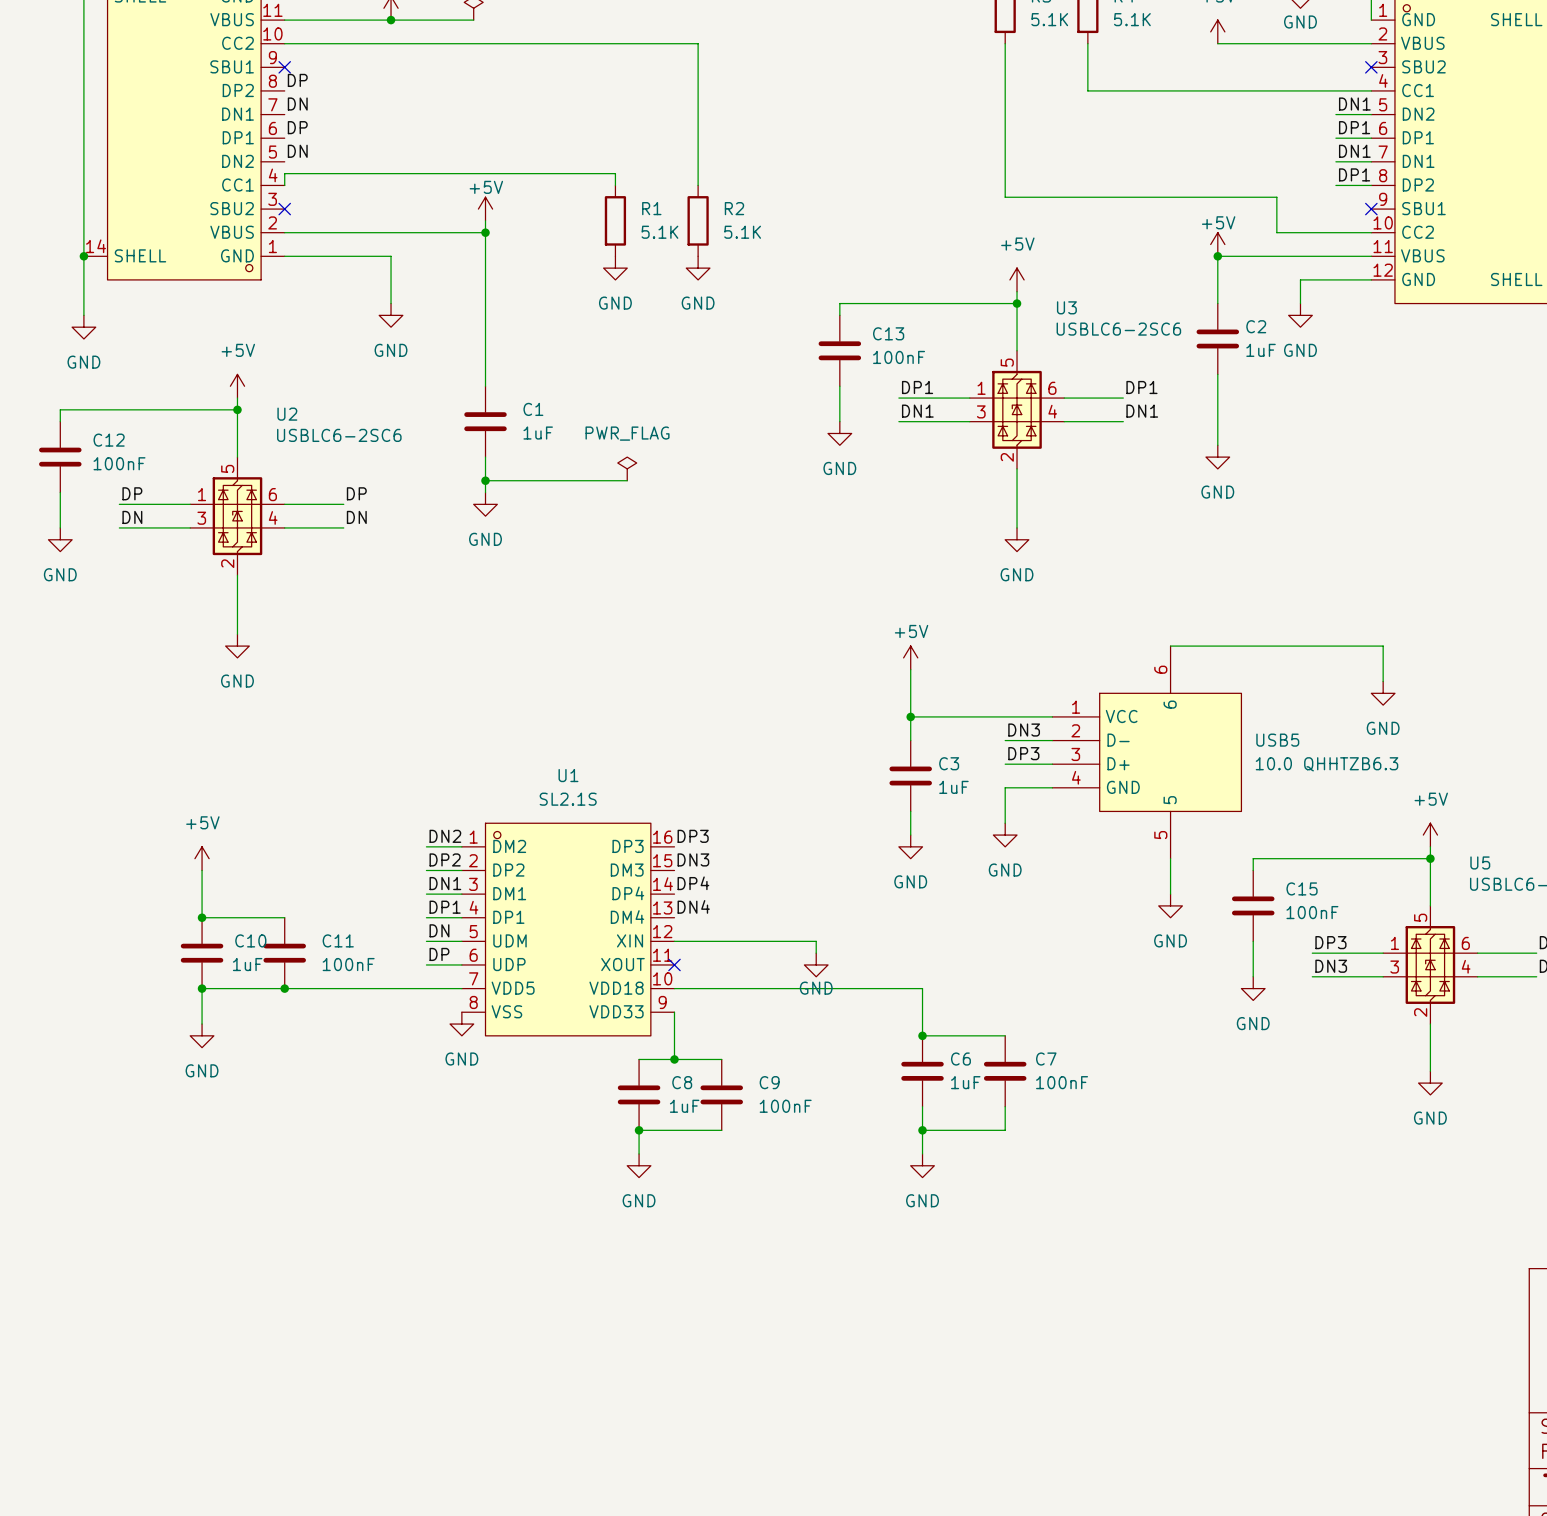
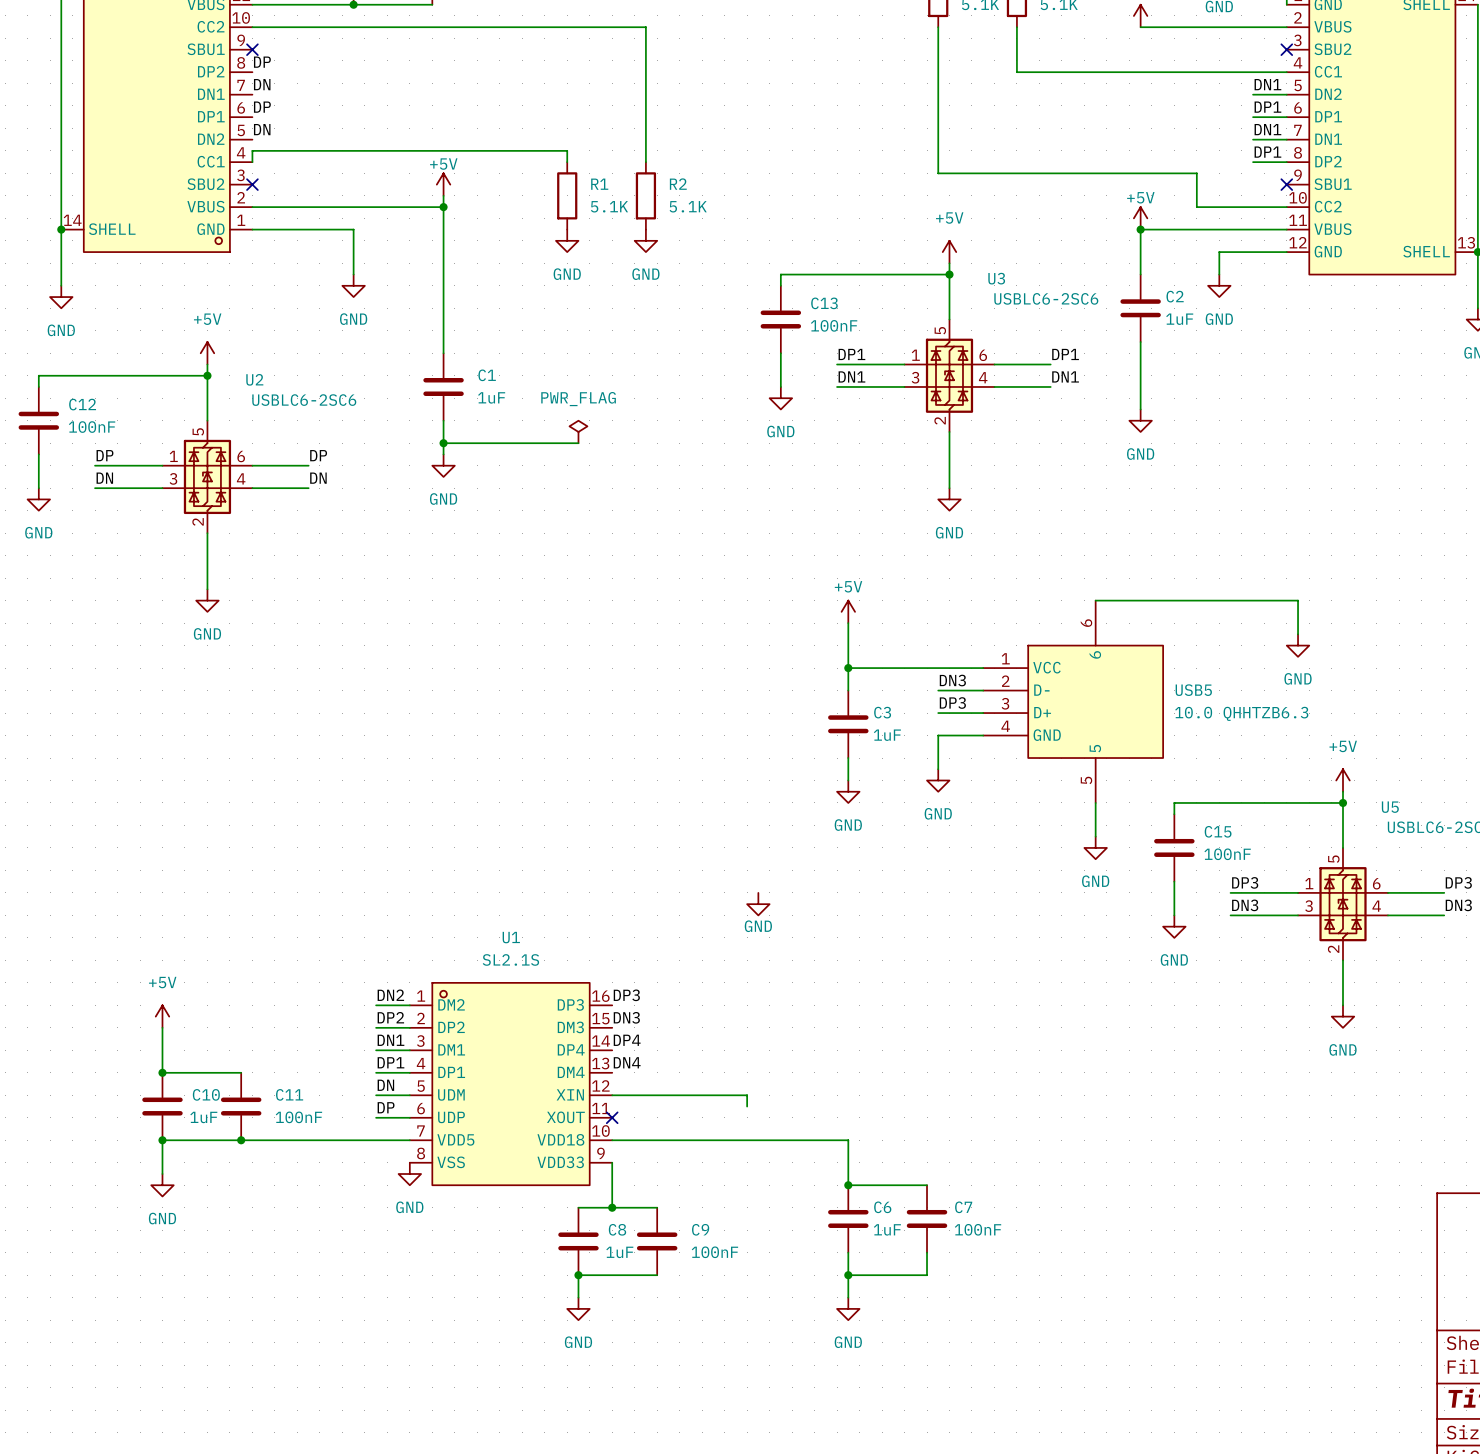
label position: DN2 (445, 836) -> DN2 (390, 995)
label position: DP3 (693, 836) -> DP3 (626, 995)
wire: (426, 846) (461, 846) -> (376, 1005) (409, 1005)
power symbol position: +5V (202, 858) -> +5V (162, 1016)
label position: DP2 (445, 859) -> DP2 (390, 1017)
label position: DN3 (693, 859) -> DN3 (626, 1017)
wire: (202, 870) (202, 917) (284, 917) -> (162, 1027) (162, 1072) (241, 1072)
wire: (426, 870) (461, 870) -> (376, 1027) (409, 1027)
label position: DN1 (445, 883) -> DN1 (390, 1040)
label position: DP4 (693, 883) -> DP4 (627, 1040)
wire: (426, 894) (461, 894) -> (376, 1050) (409, 1050)
label position: DN4 (693, 906) -> DN4 (627, 1062)
label position: DP1 (445, 907) -> DP1 (390, 1062)
junction: (202, 917) -> none
wire: (426, 917) (461, 917) -> (376, 1072) (409, 1072)
U1 position: (568, 929) -> (511, 1084)
label position: DN (439, 930) -> DN (385, 1085)
wire: (426, 941) (461, 941) -> (376, 1095) (409, 1095)
wire: (674, 941) (816, 941) (816, 953) -> (612, 1095) (747, 1095) (747, 1106)
C10 position: (202, 953) -> (162, 1106)
C11 position: (284, 953) -> (241, 1106)
label position: DP (439, 954) -> DP (386, 1107)
wire: (426, 964) (461, 964) -> (376, 1117) (409, 1117)
no-connect mark: (674, 964) -> none
junction: (202, 988) -> none
junction: (284, 988) -> none
wire: (461, 988) (202, 988) (202, 1024) -> (409, 1140) (162, 1140) (162, 1174)
wire: (674, 988) (922, 988) (922, 1035) (1005, 1035) -> (612, 1140) (848, 1140) (848, 1185) (927, 1185)
wire: (674, 1012) (674, 1059) -> (612, 1162) (612, 1207)
power symbol: GND (461, 1024) -> none
power symbol: GND (202, 1035) -> none
junction: (922, 1035) -> none
wire: (639, 1059) (721, 1059) -> (578, 1207) (657, 1207)
junction: (674, 1059) -> none
C6 position: (922, 1071) -> (848, 1218)
C7 position: (1005, 1071) -> (927, 1218)
C8 position: (639, 1094) -> (578, 1241)
C9 position: (721, 1094) -> (657, 1241)
wire: (922, 1106) (922, 1153) -> (848, 1252) (848, 1297)
wire: (1005, 1106) (1005, 1130) (922, 1130) -> (927, 1252) (927, 1275) (848, 1275)
junction: (639, 1130) -> none
wire: (721, 1130) (639, 1130) (639, 1153) -> (657, 1275) (578, 1275) (578, 1297)
junction: (922, 1130) -> none
junction: none -> (162, 1072)
power symbol: GND (639, 1165) -> none
power symbol: GND (922, 1165) -> none
no-connect mark: none -> (612, 1117)
junction: none -> (162, 1140)
junction: none -> (241, 1140)
power symbol: none -> GND (409, 1174)
power symbol: none -> GND (162, 1185)
junction: none -> (848, 1185)
junction: none -> (612, 1207)
junction: none -> (578, 1275)
junction: none -> (848, 1275)
power symbol: none -> GND (578, 1308)
power symbol: none -> GND (848, 1308)

